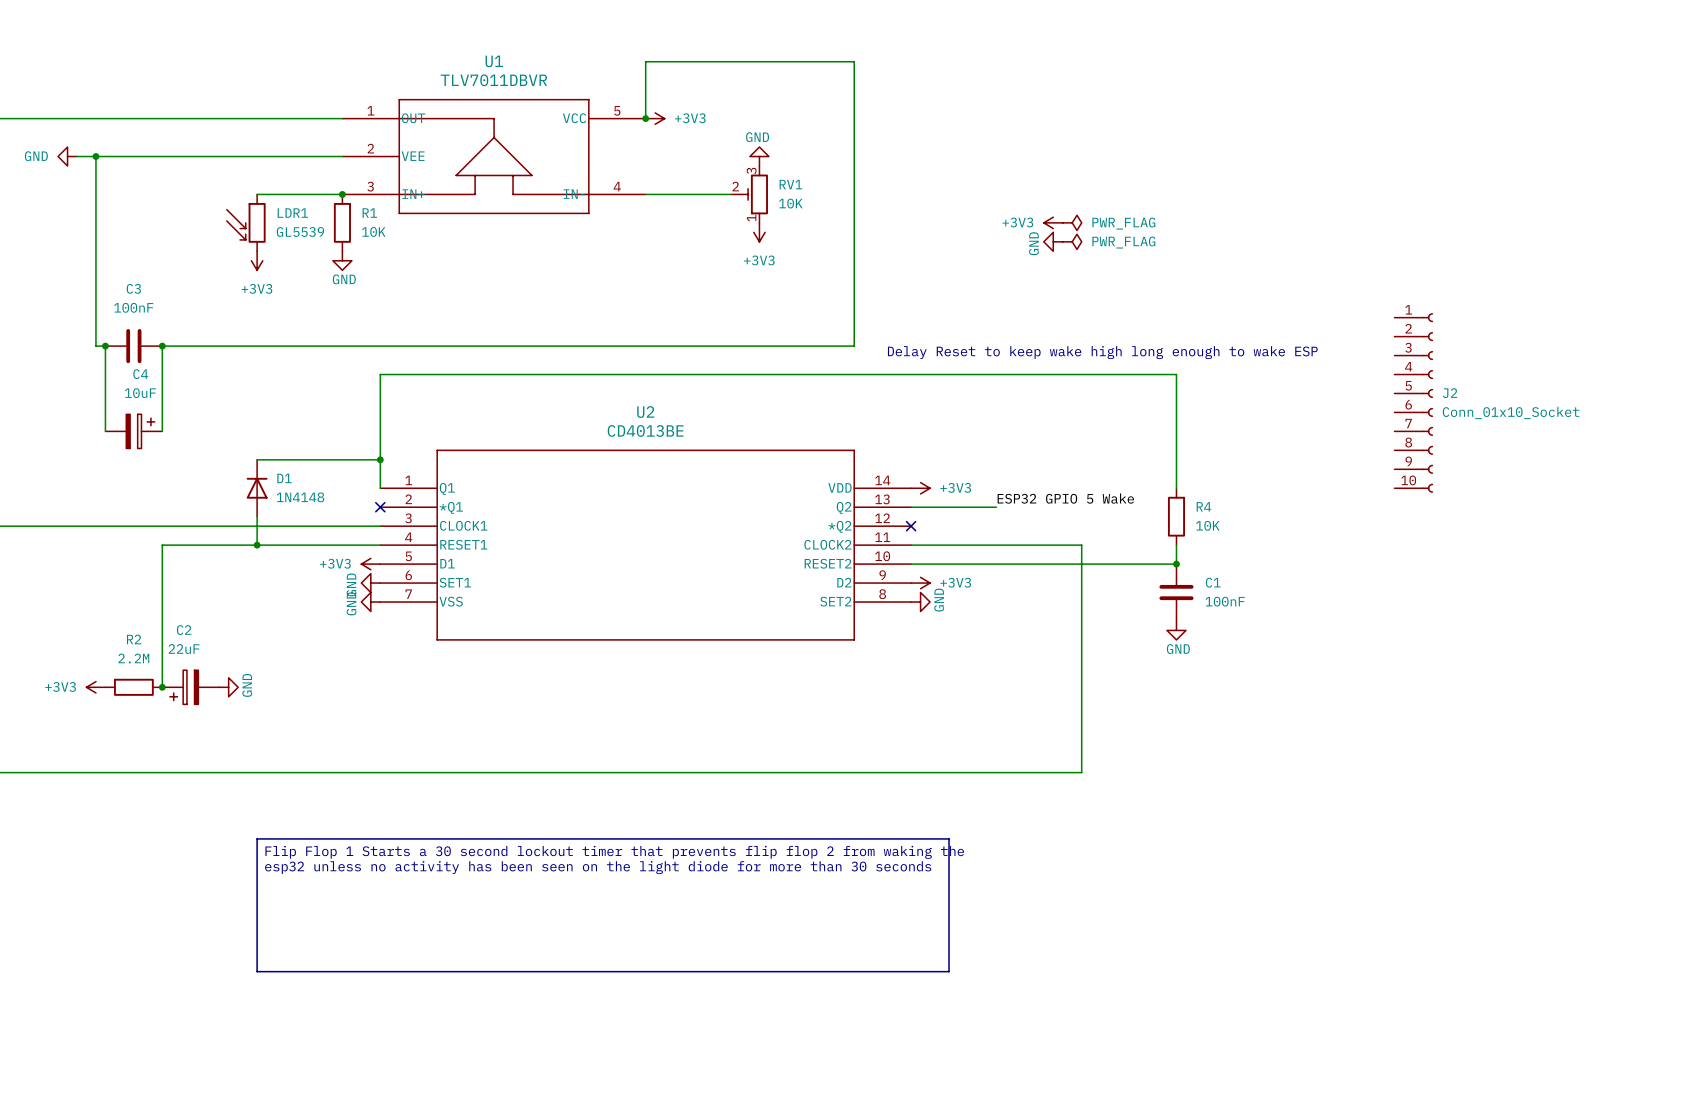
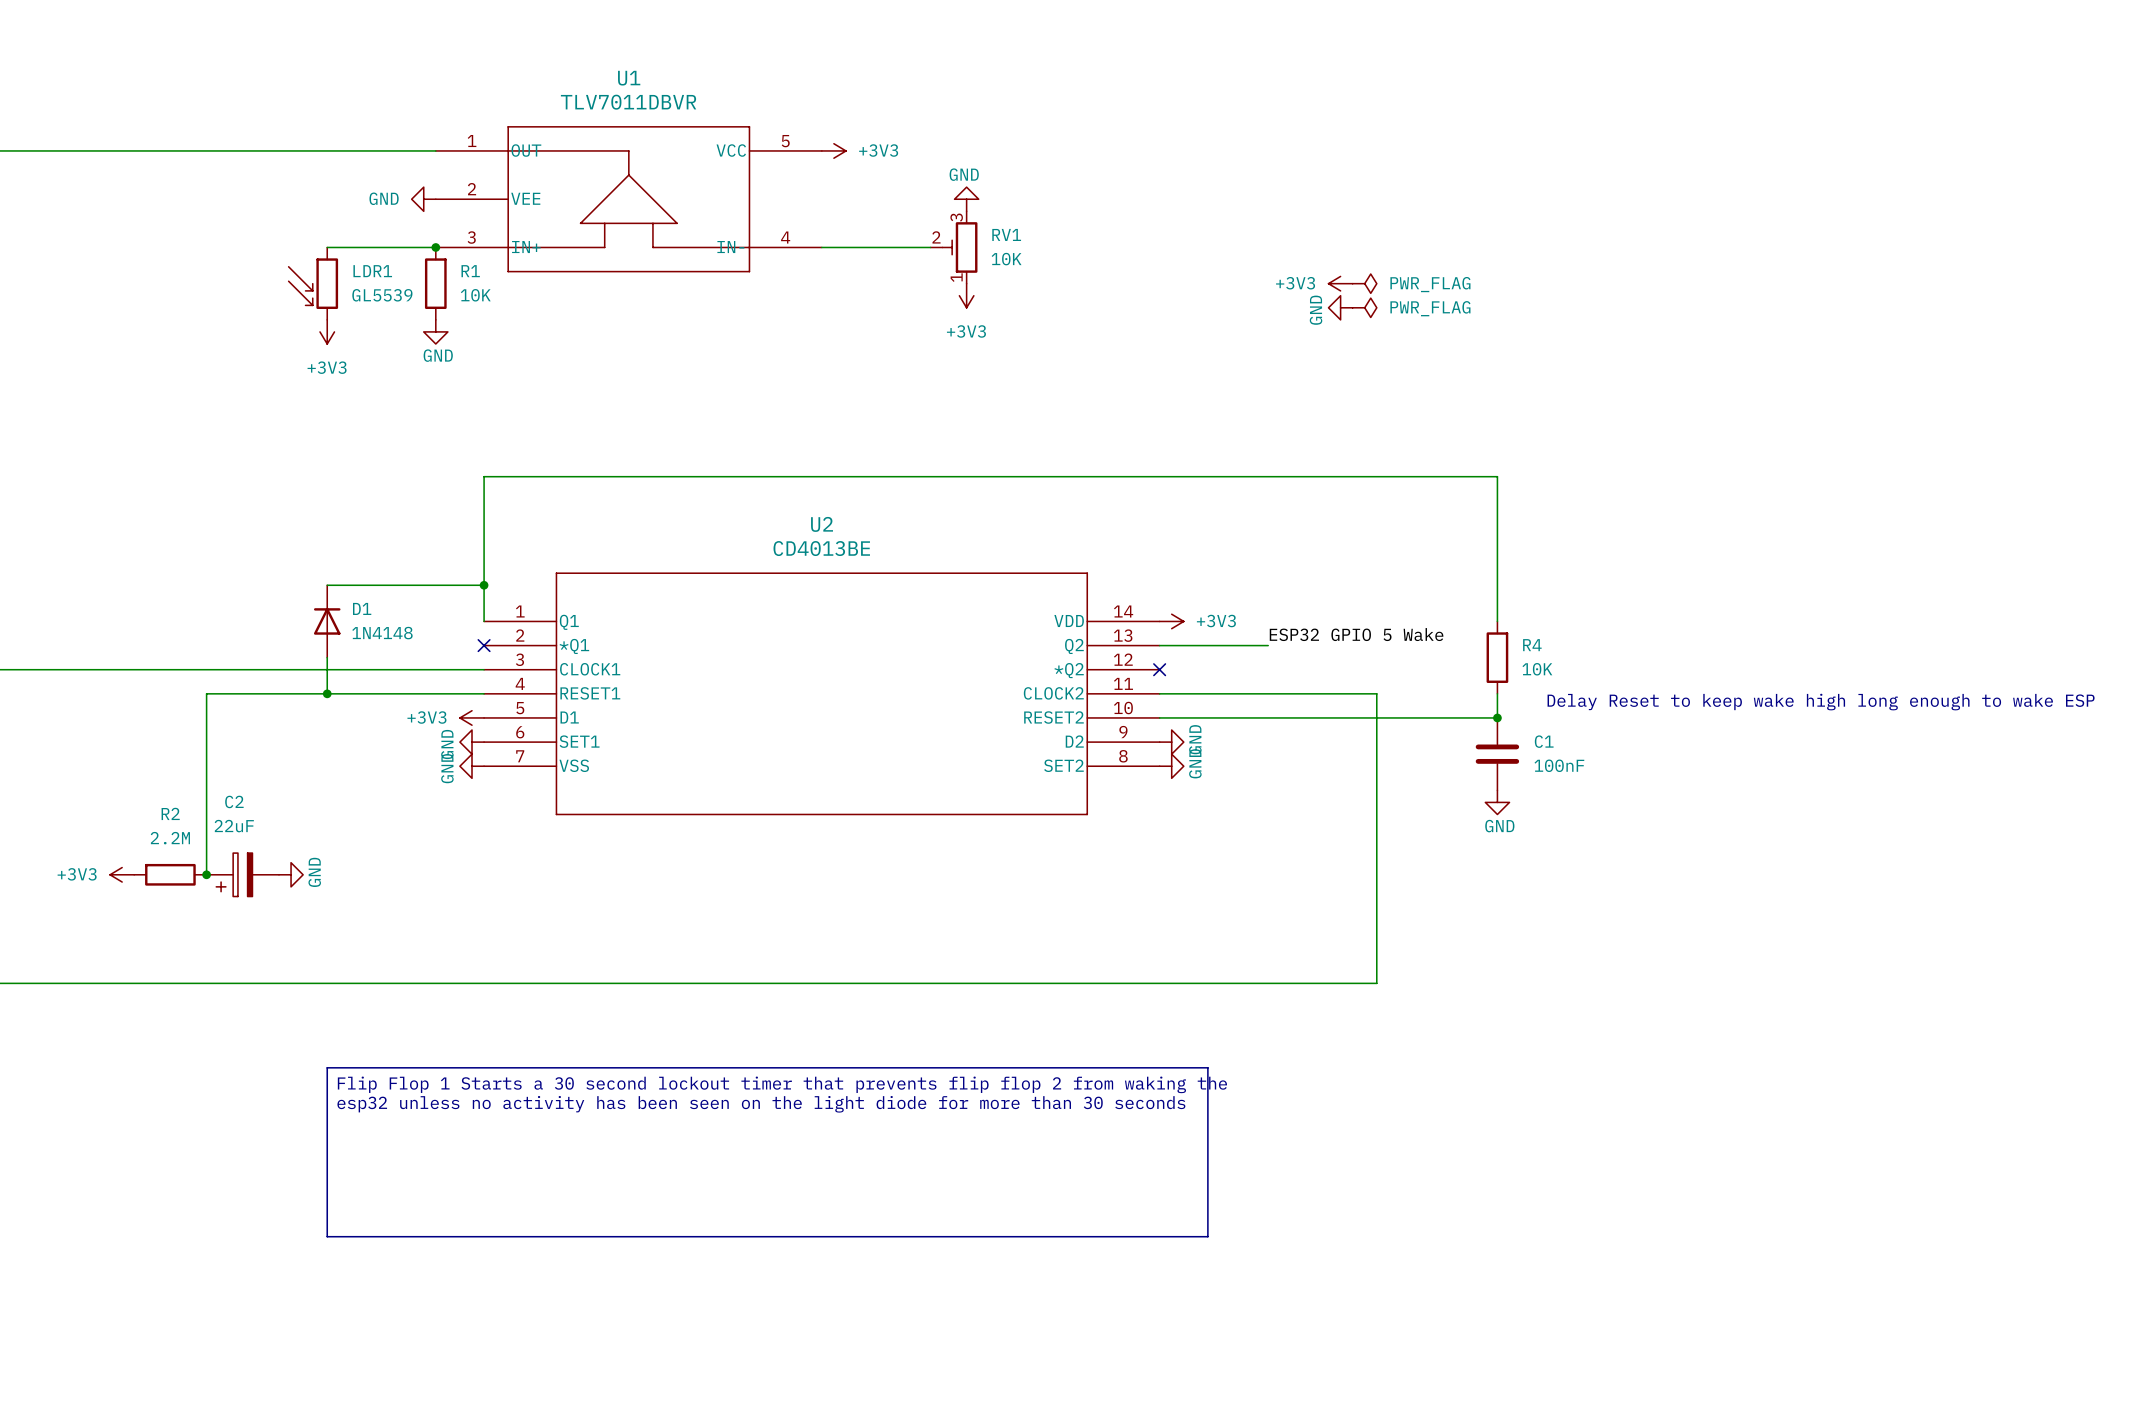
wire: (645, 118) (645, 61) (854, 61) (854, 346) (162, 346) (162, 431) -> none
junction: (645, 118) -> none
power symbol: GND (67, 156) -> none
wire: (77, 156) (342, 156) -> none
wire: (95, 156) (95, 346) (105, 346) (105, 431) -> none
junction: (95, 156) -> none
power symbol: none -> GND (423, 199)
junction: (105, 346) -> none
C3: 100nF (133, 346) -> none
junction: (162, 346) -> none
text: Delay Reset to keep wake high long enough to wake ESP (1102, 352) -> none
J2: Conn_01x10_Socket (1413, 402) -> none
C4: 10uF (133, 431) -> none
text: none -> Delay Reset to keep wake high long enough to wake ESP (1821, 702)
power symbol: +3V3 (920, 583) -> GND (1171, 742)

